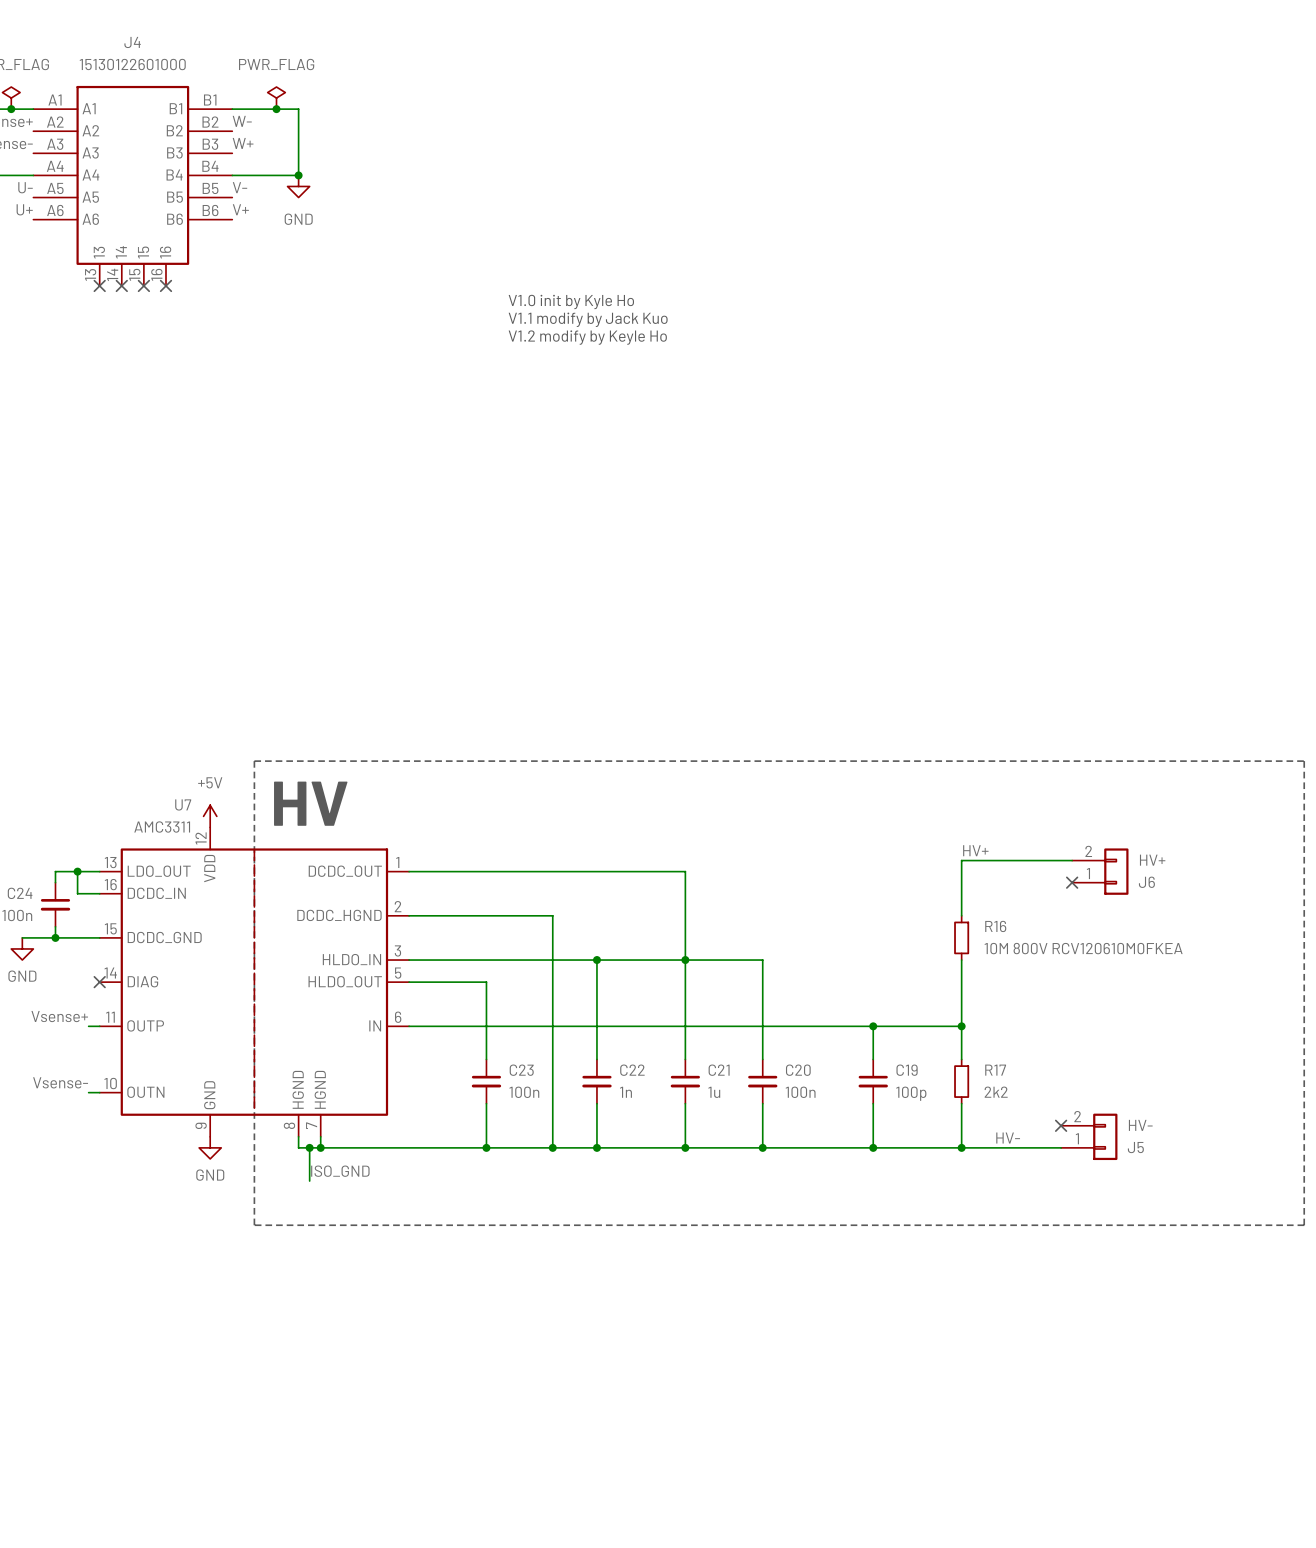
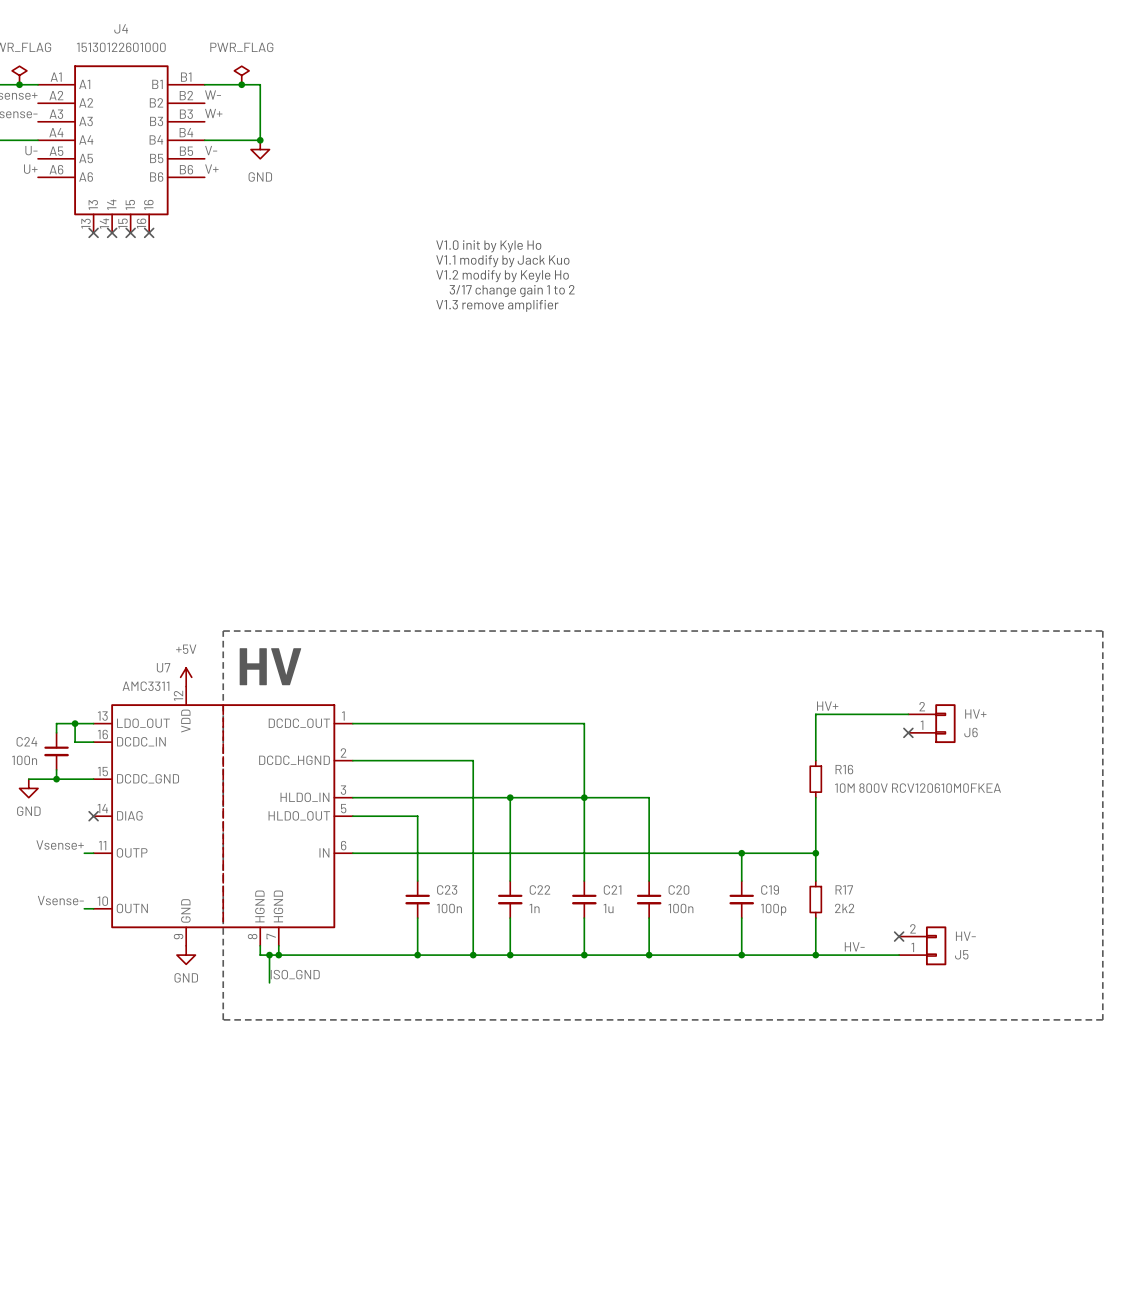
text: none -> 3/17 change gain 1 to 2 (512, 291)
text: none -> V1.3 remove amplifier (497, 305)

